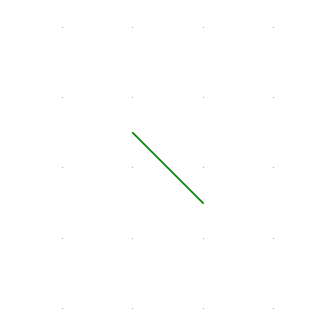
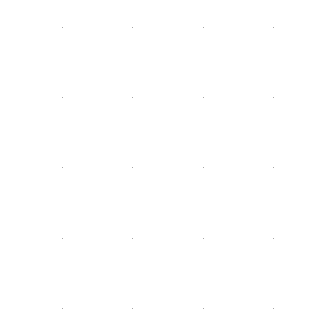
wire: (132, 132) (203, 203) -> none

